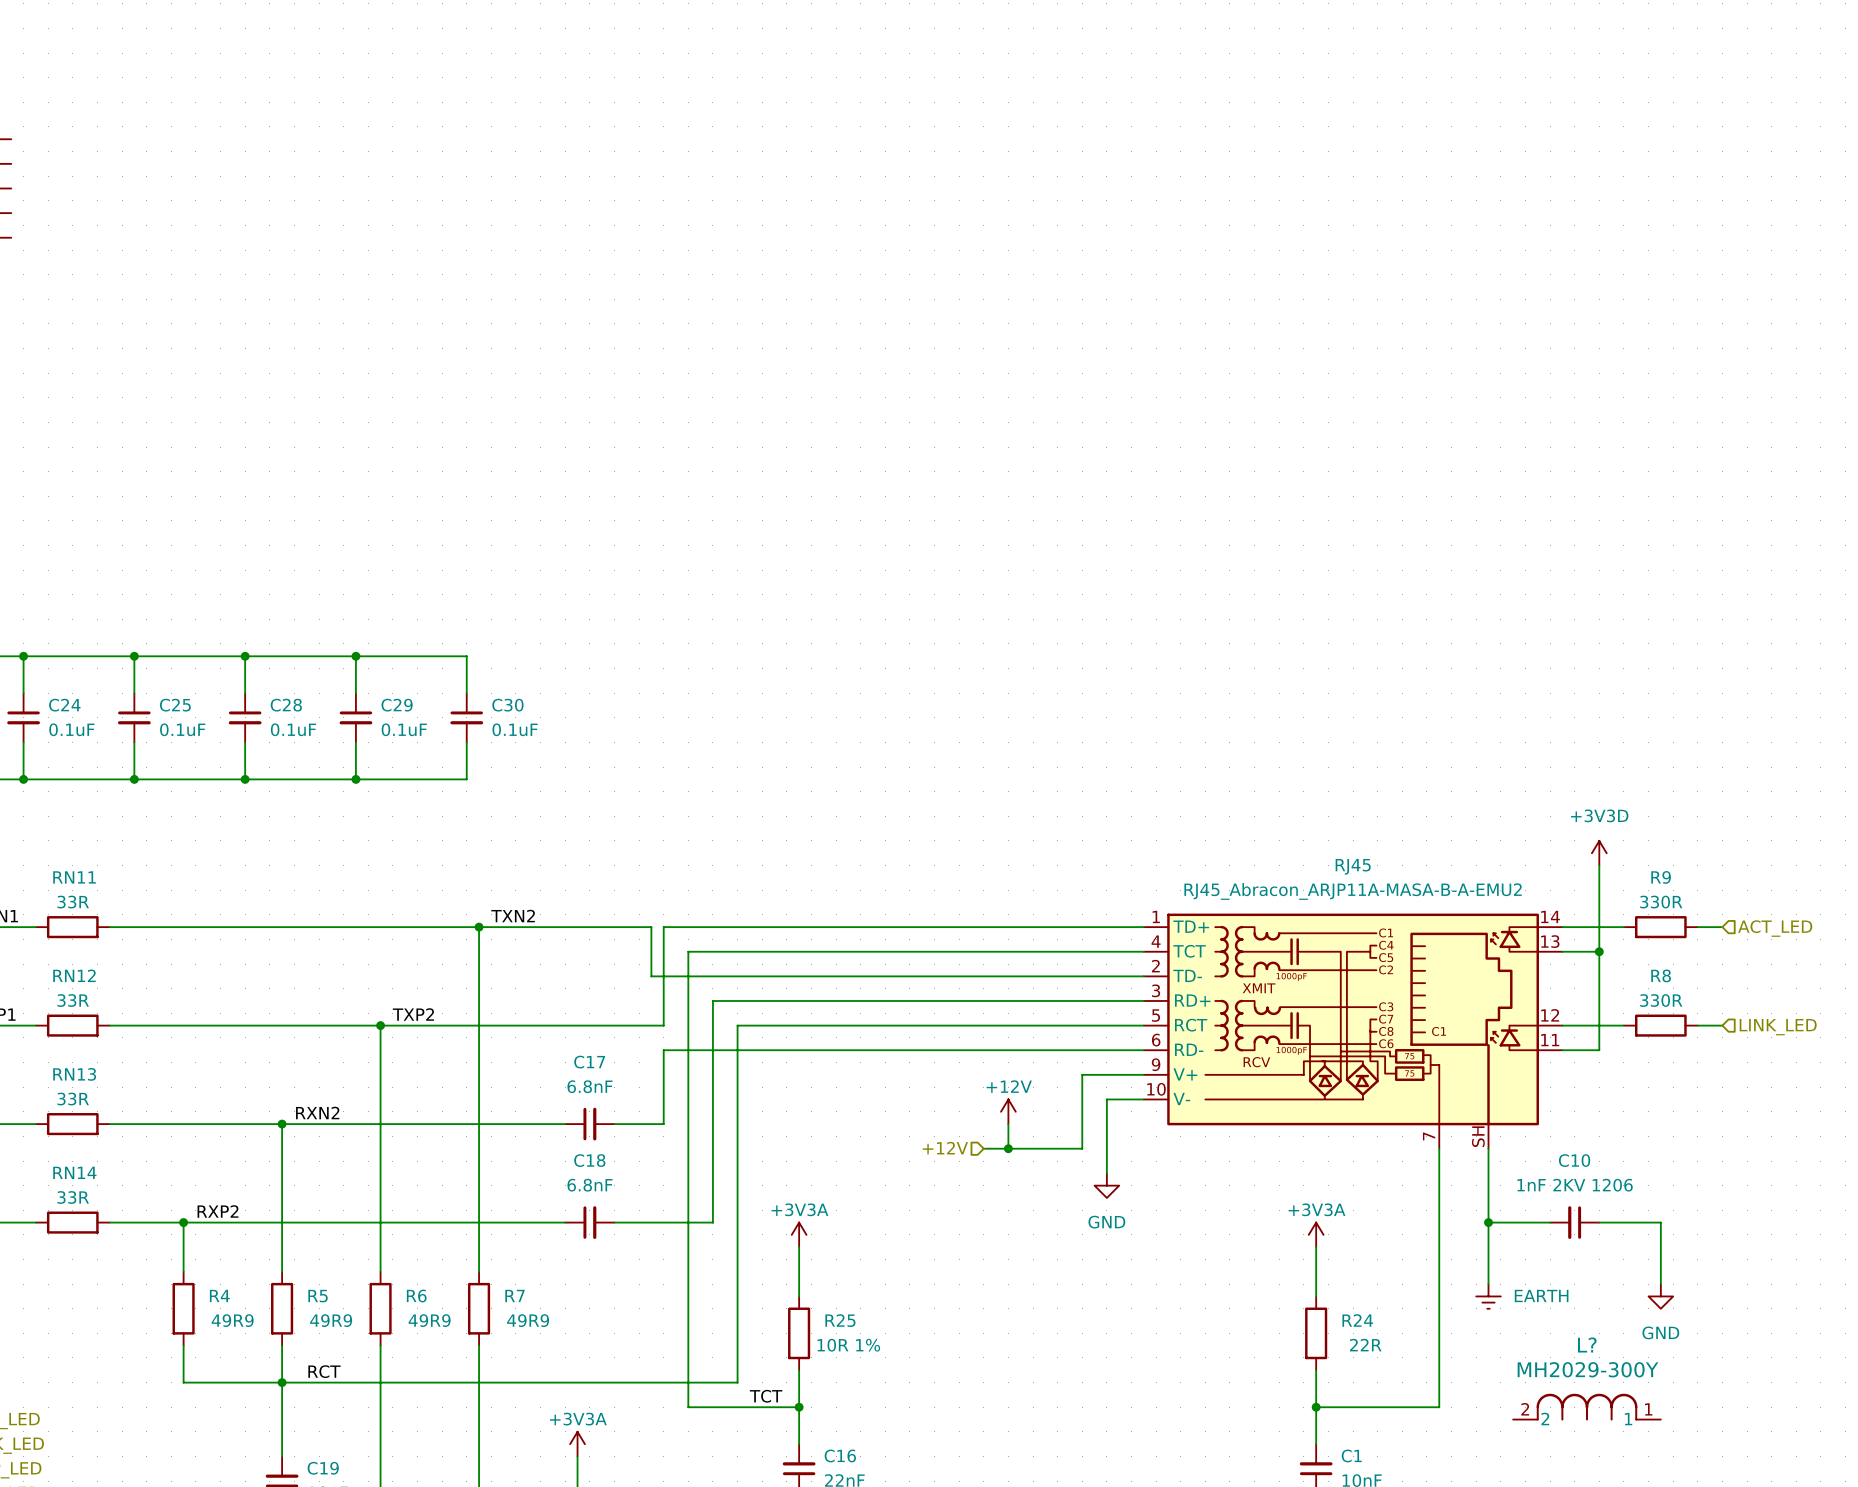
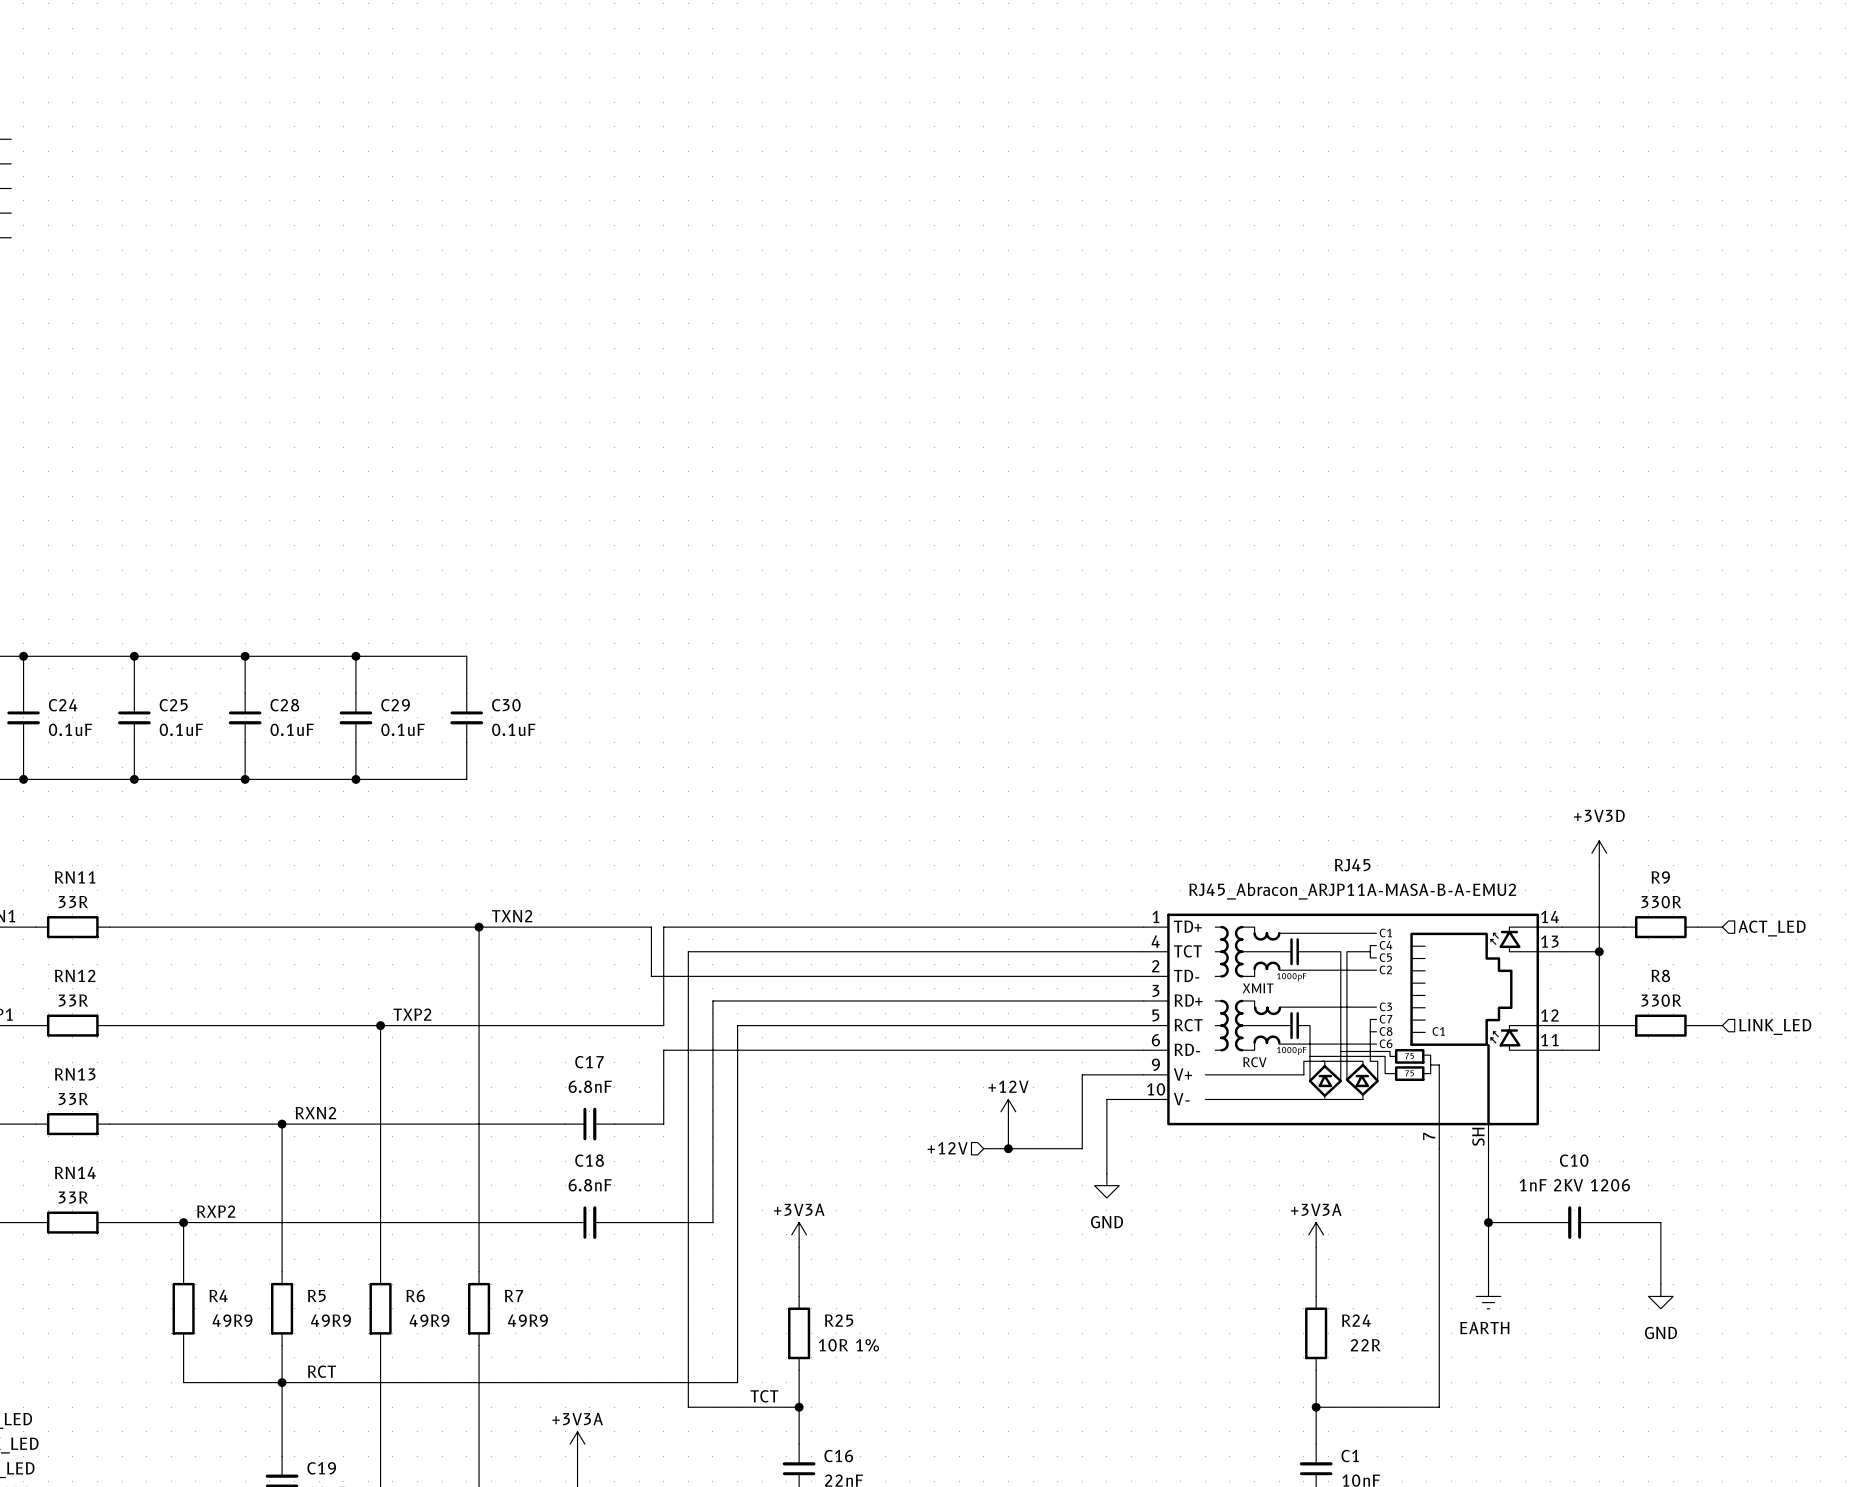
power symbol text position: EARTH (1541, 1295) -> EARTH (1484, 1327)
L?: MH2029-300Y (1586, 1407) -> none

